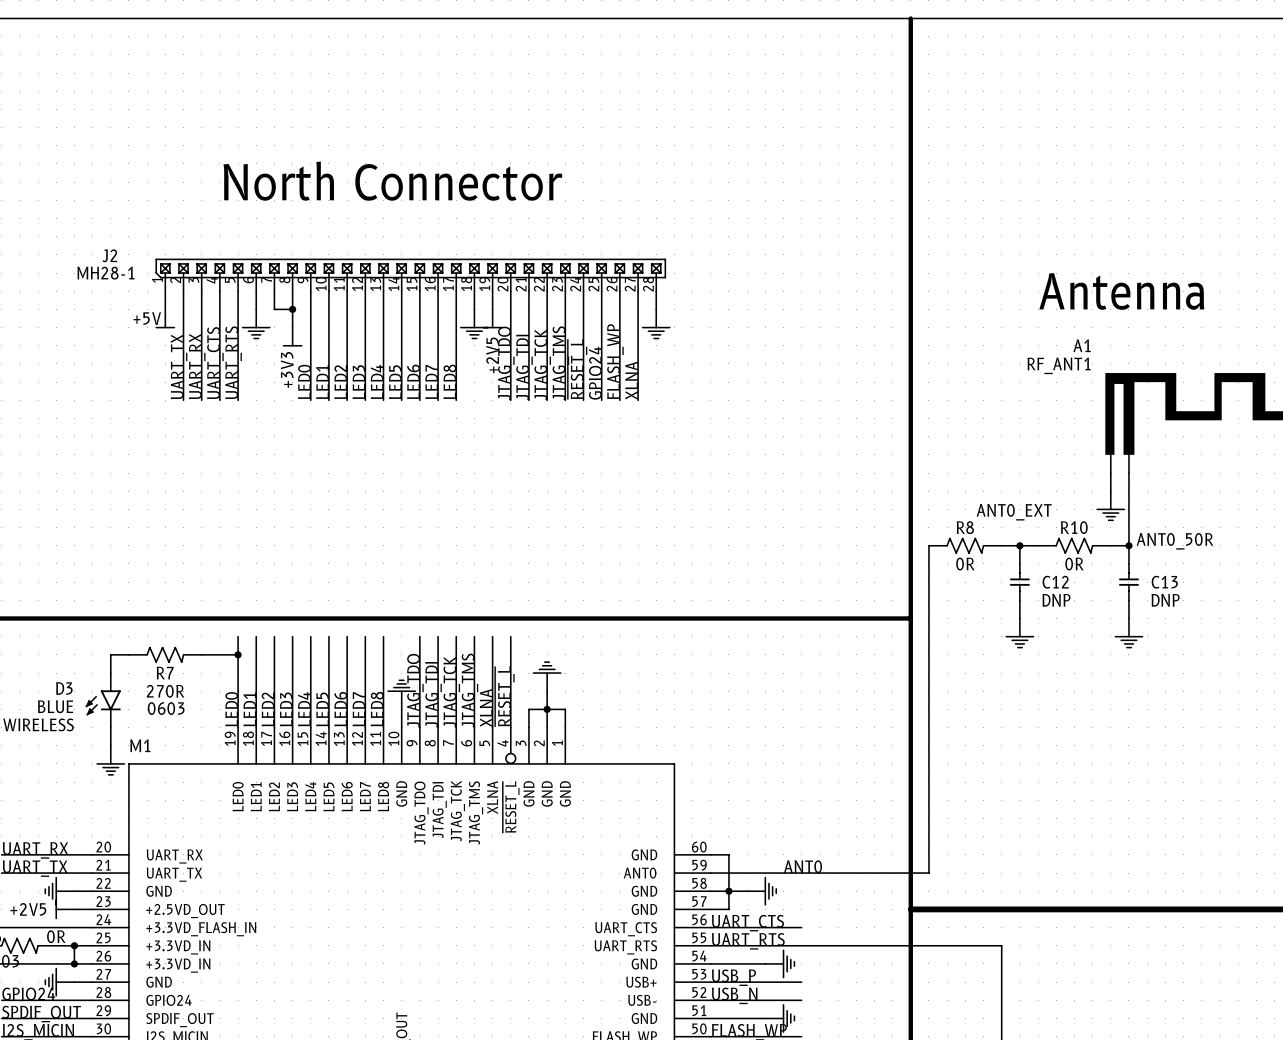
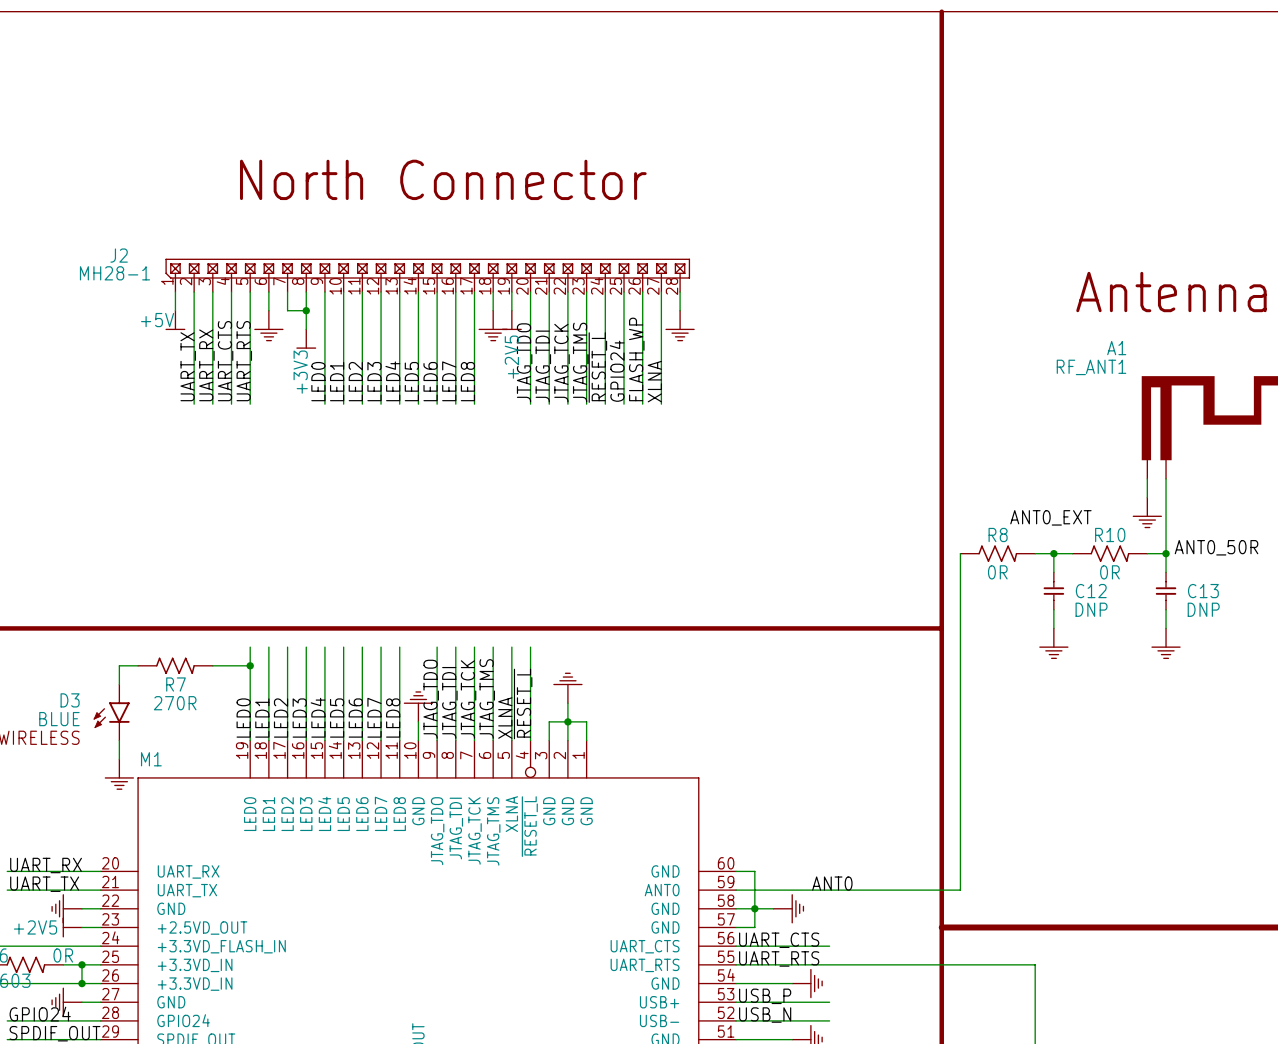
R7 text: 0603 (166, 708) -> none

